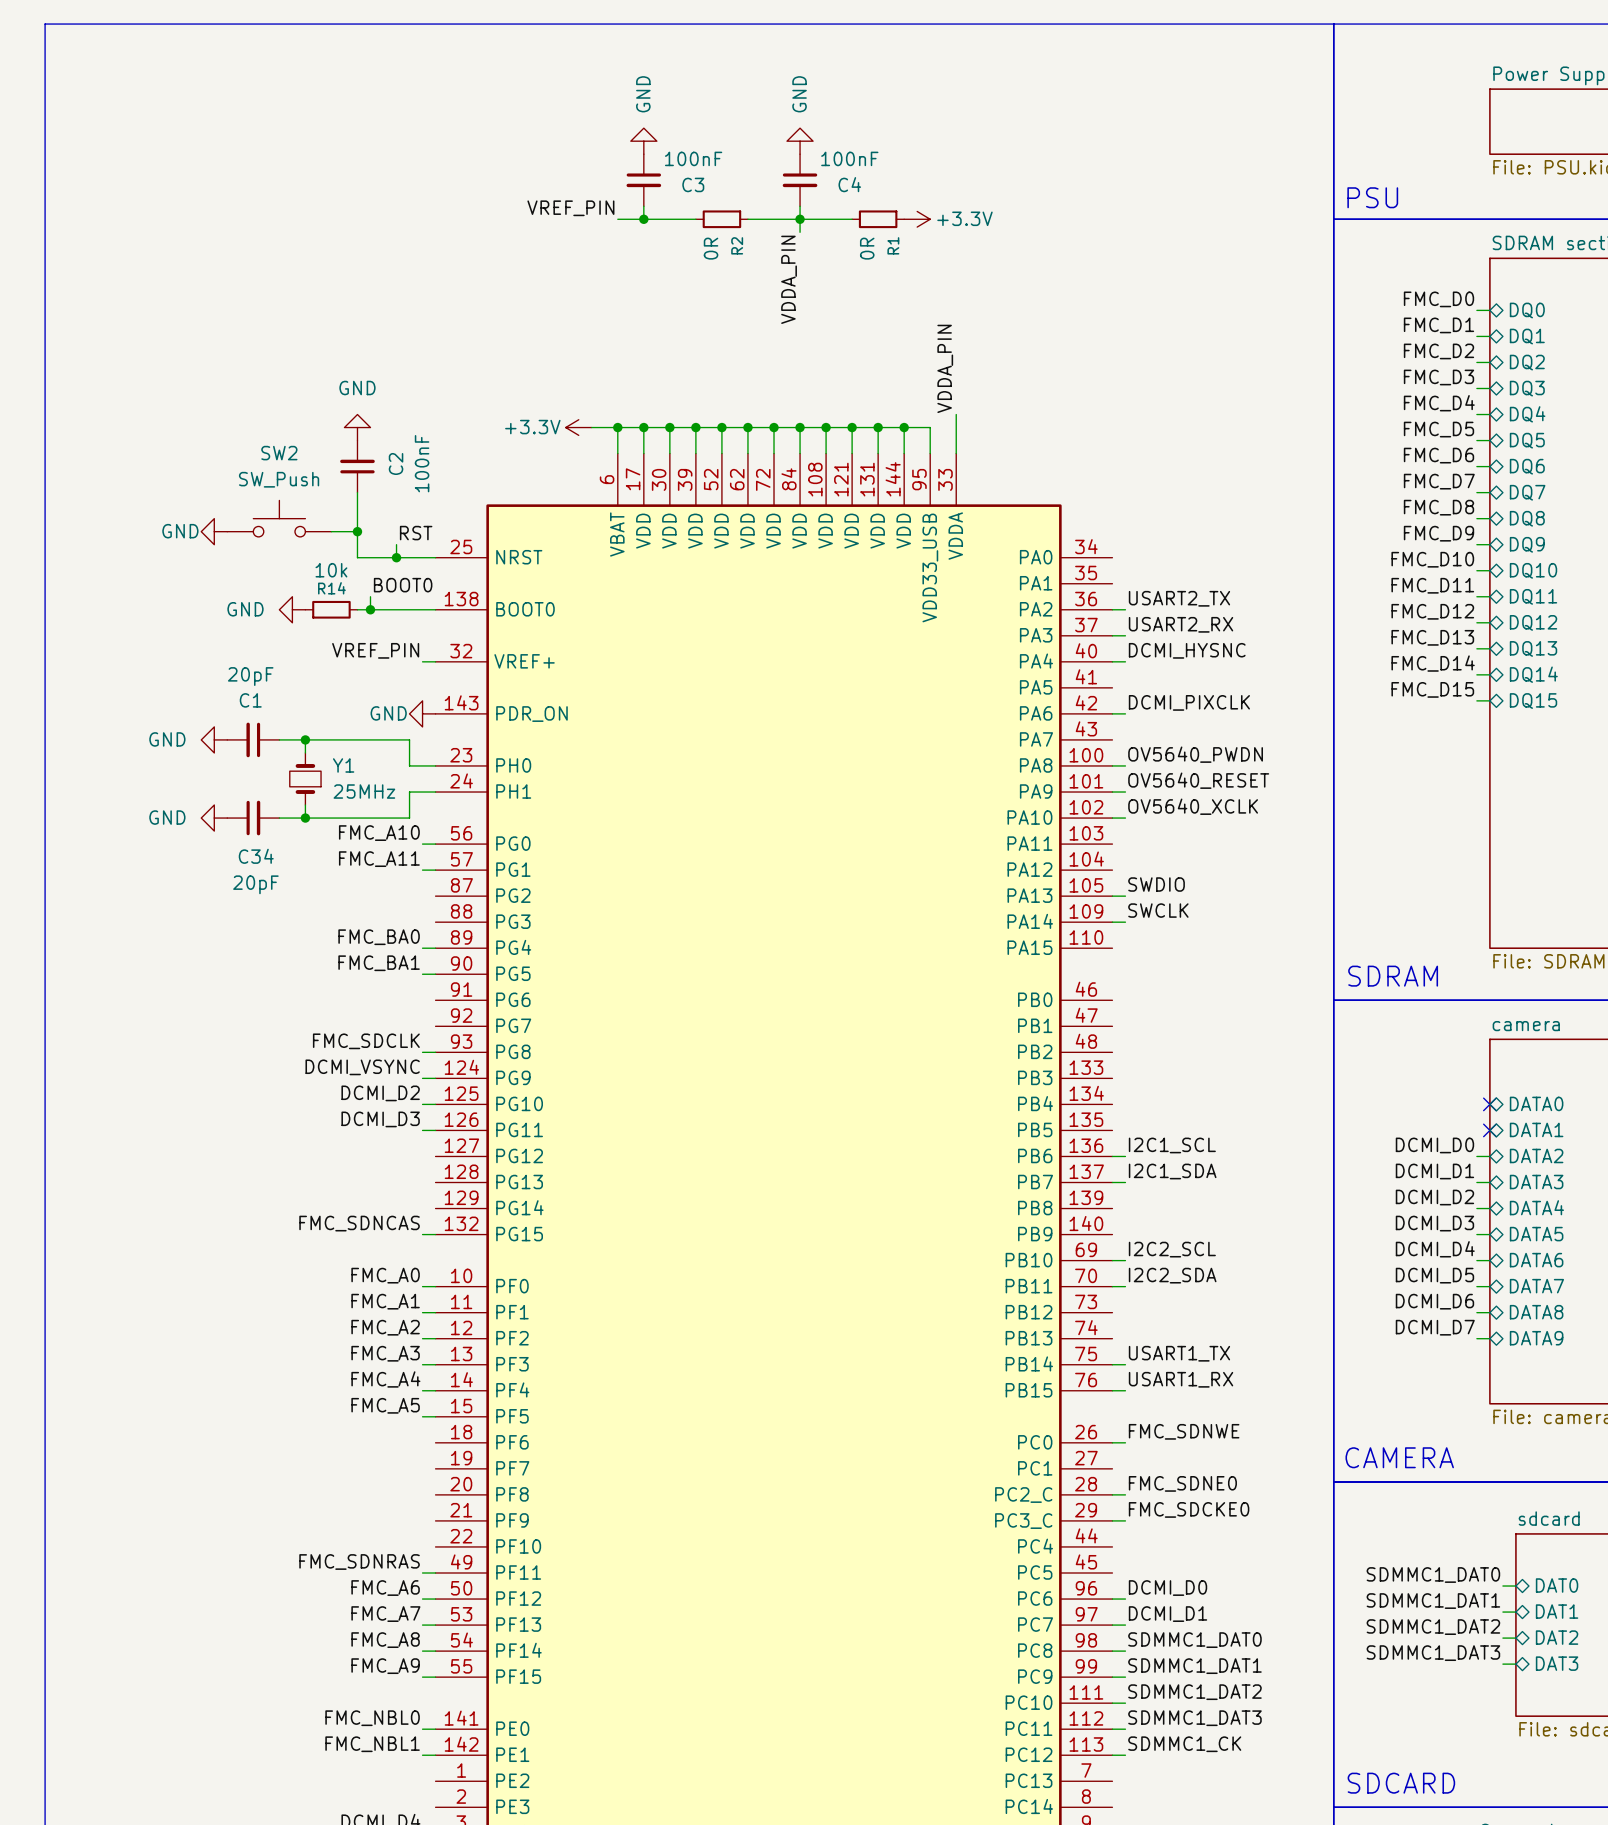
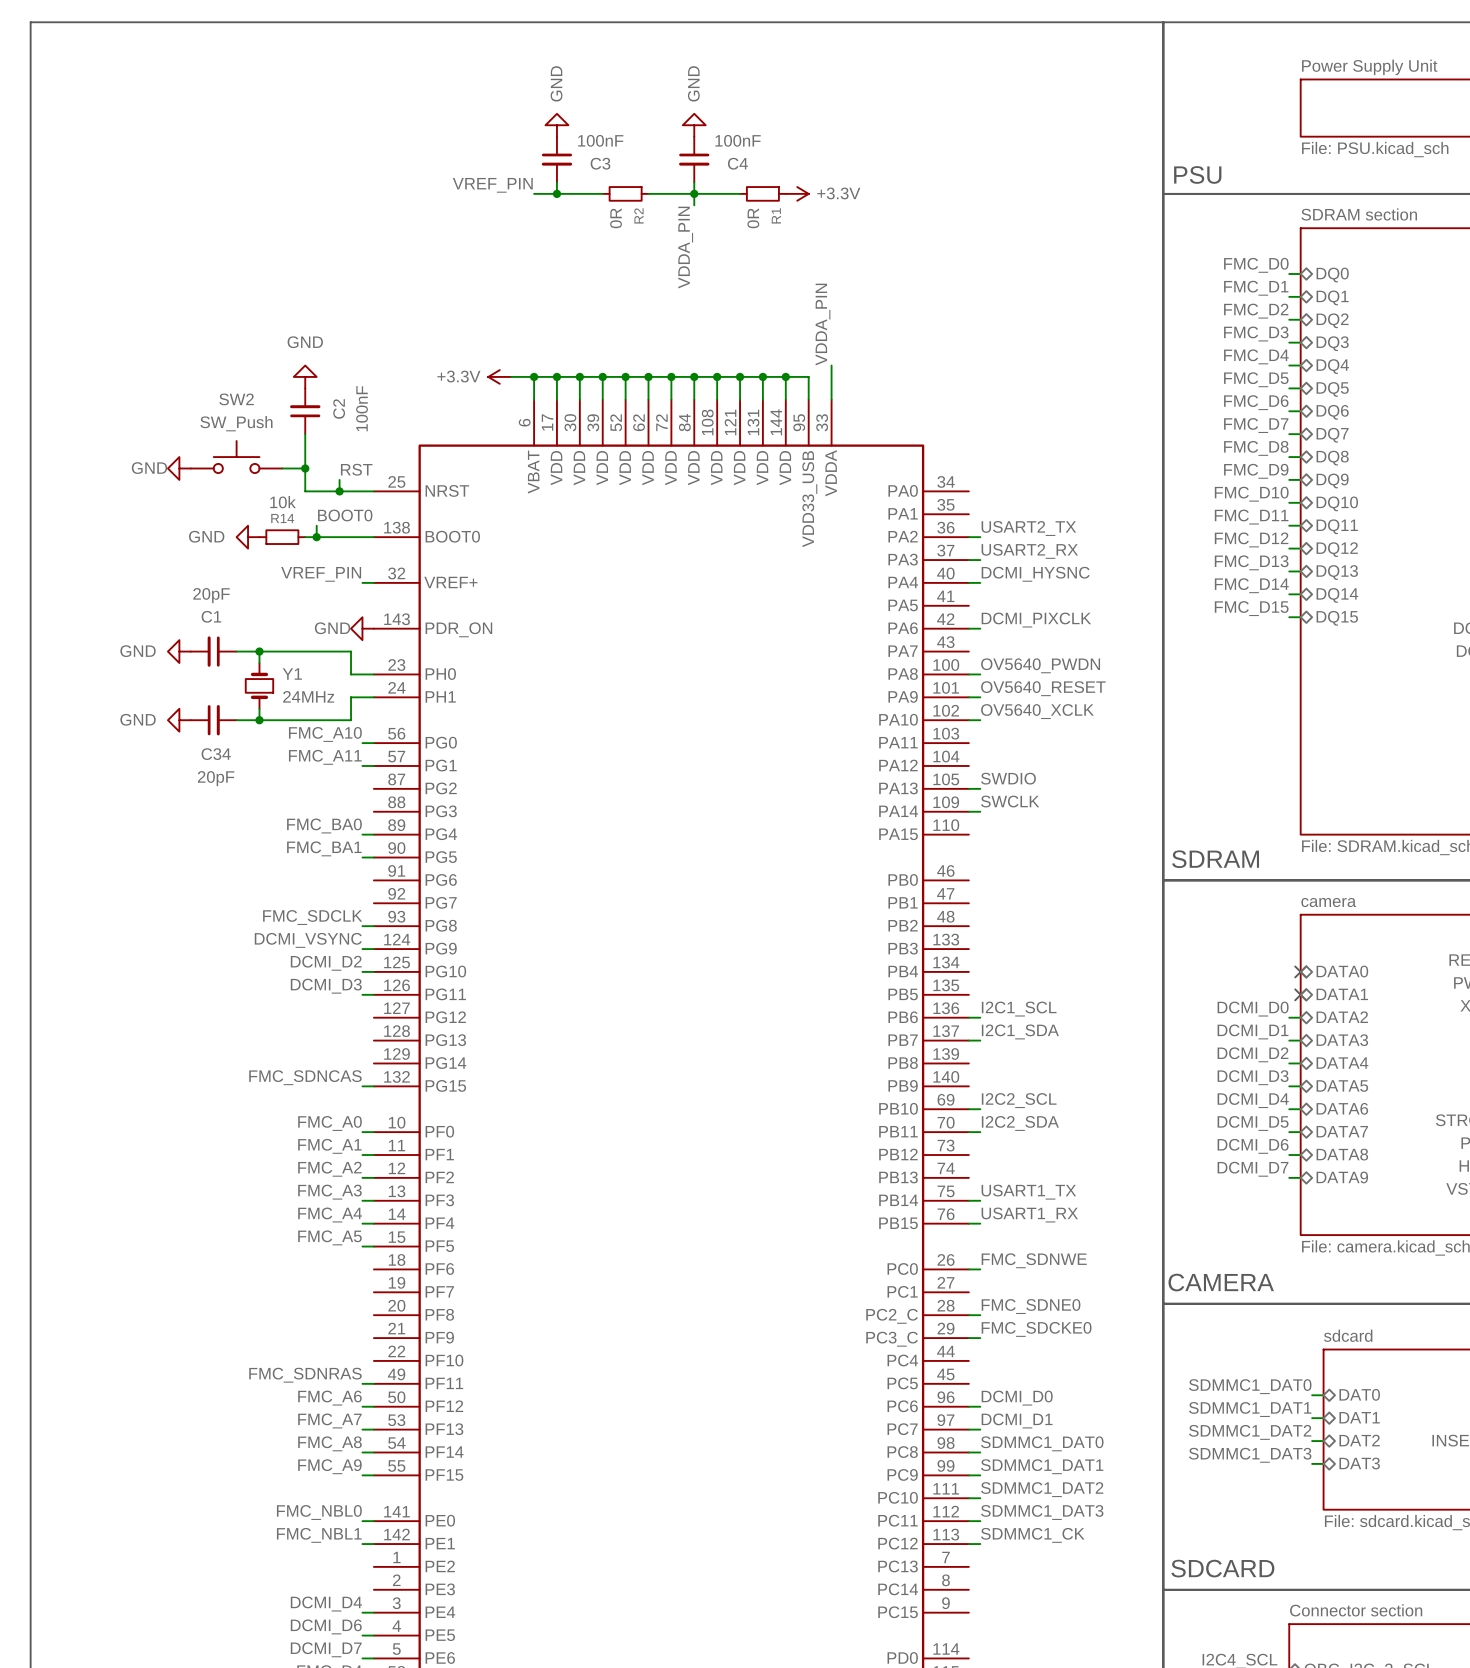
Y1 value: 25MHz (364, 791) -> 24MHz (308, 696)

